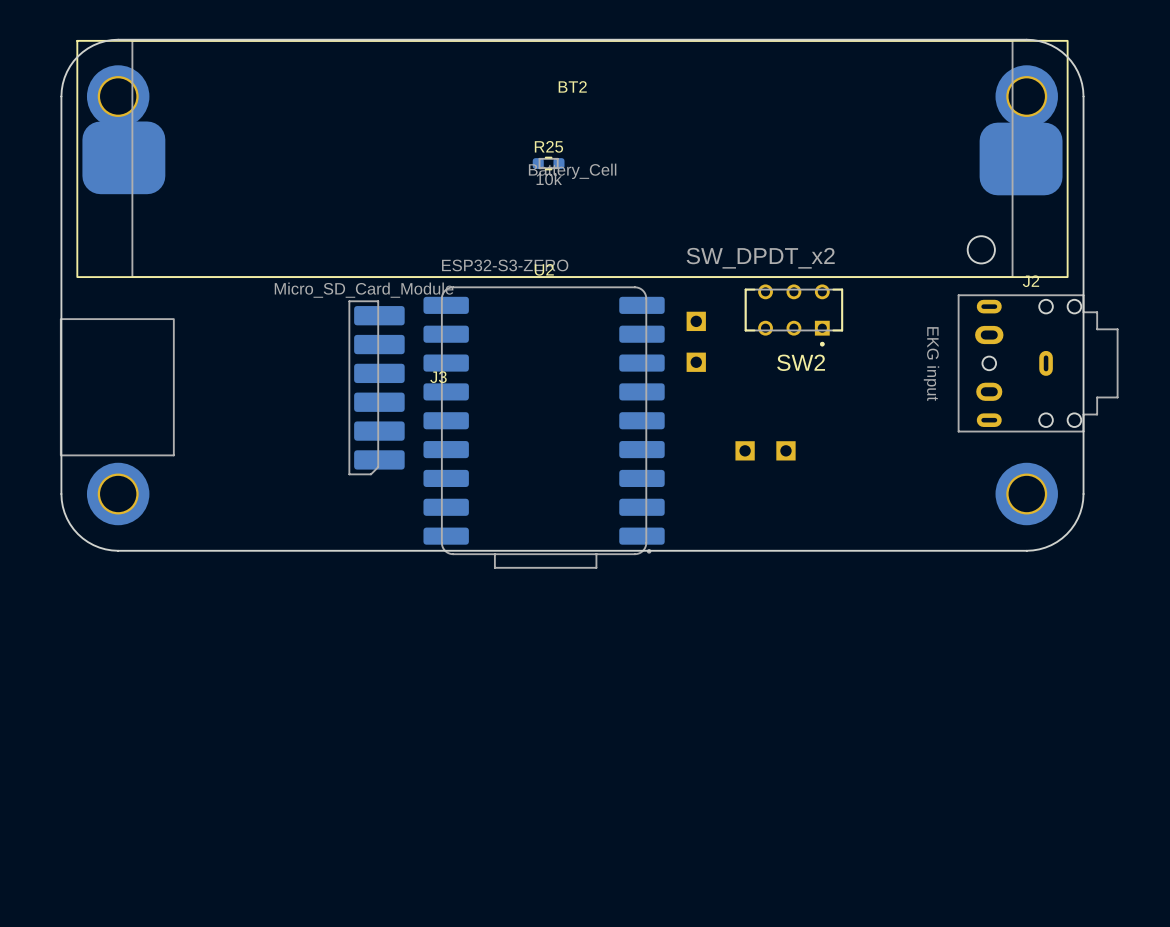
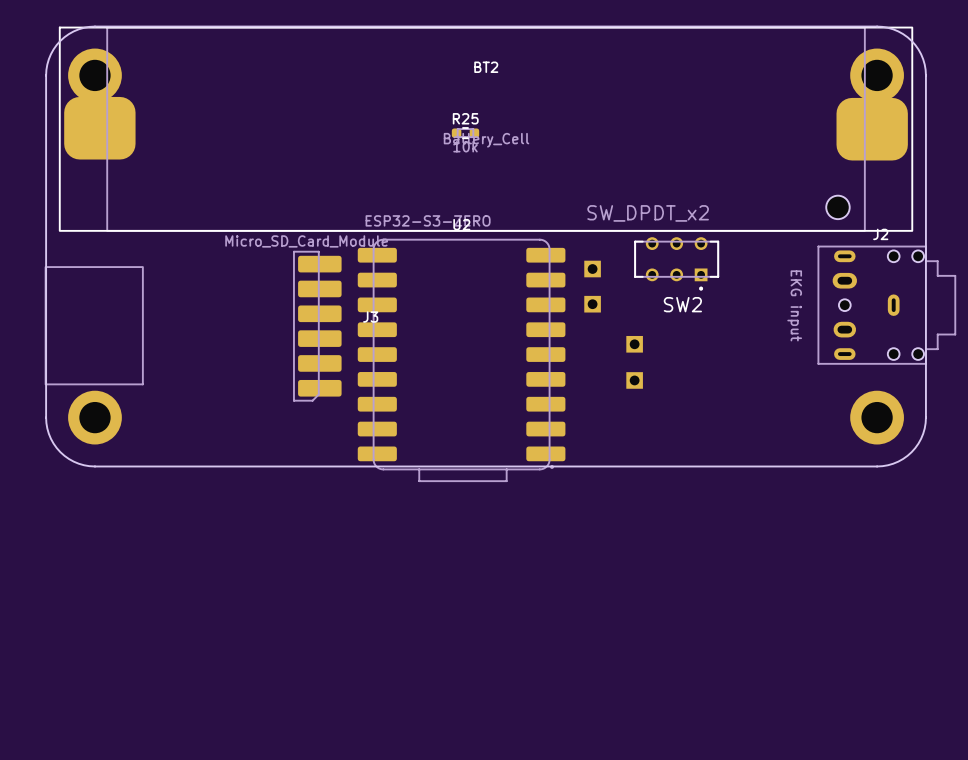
part position: (785, 450) -> (634, 344)

